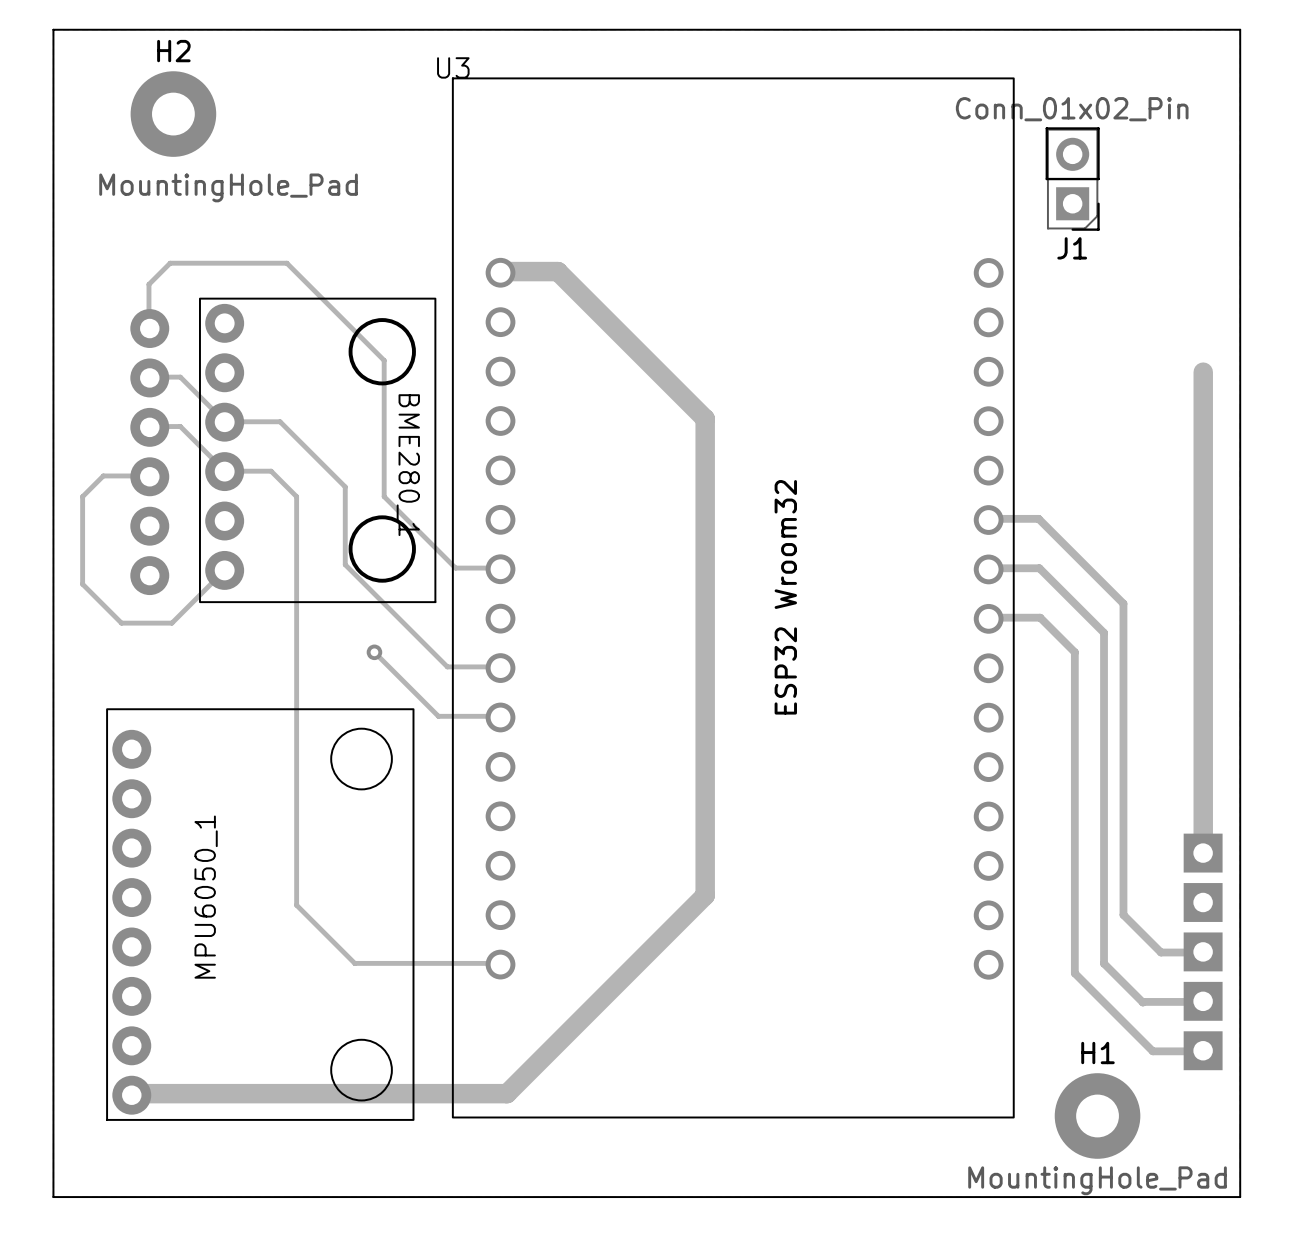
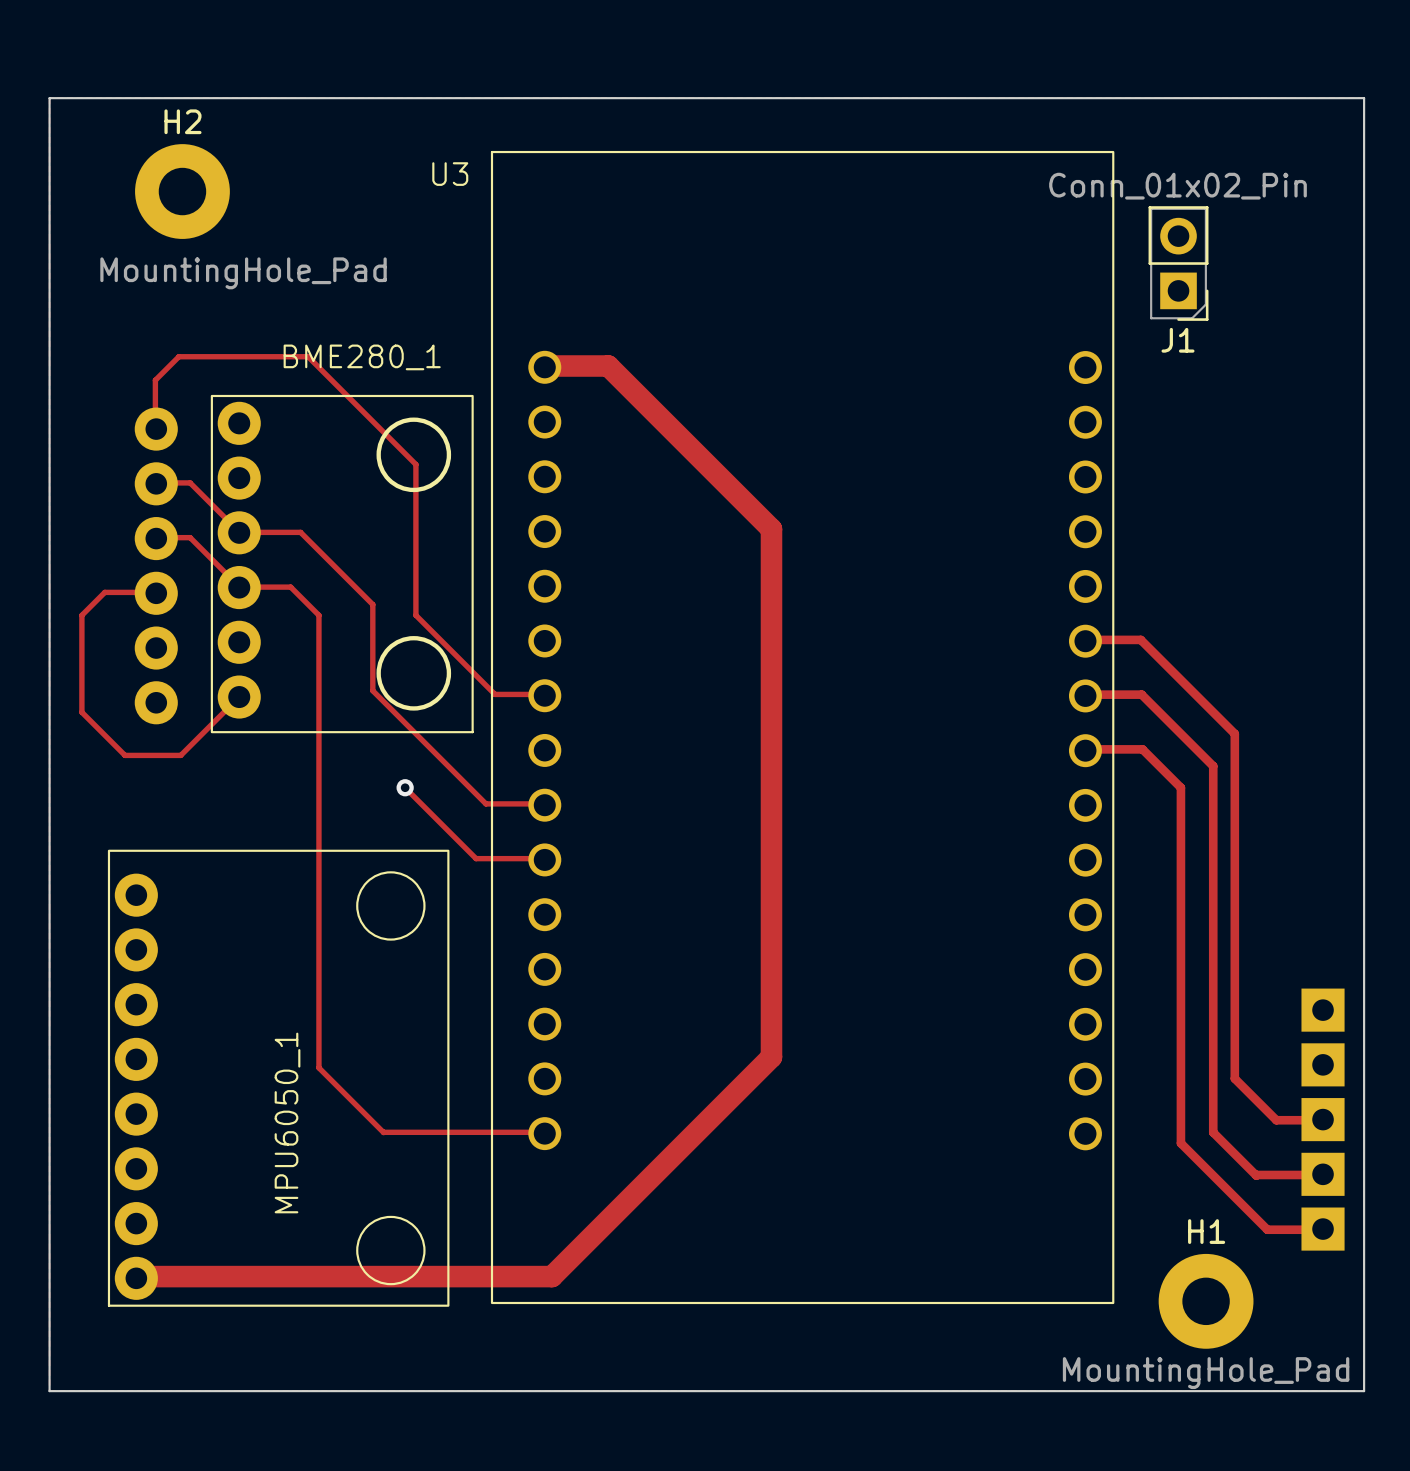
U3 name position: U3 (453, 67) -> U3 (450, 174)
track: (1203, 372) (1203, 853) -> none
BME280_1 name rotation: 0° (408, 465) -> 90° counterclockwise (362, 357)
BME280_1 name position: BME280_1 (408, 465) -> BME280_1 (362, 357)
text: ESP32 Wroom32 (785, 597) -> none
MPU6050_1 name position: MPU6050_1 (206, 897) -> MPU6050_1 (287, 1122)

